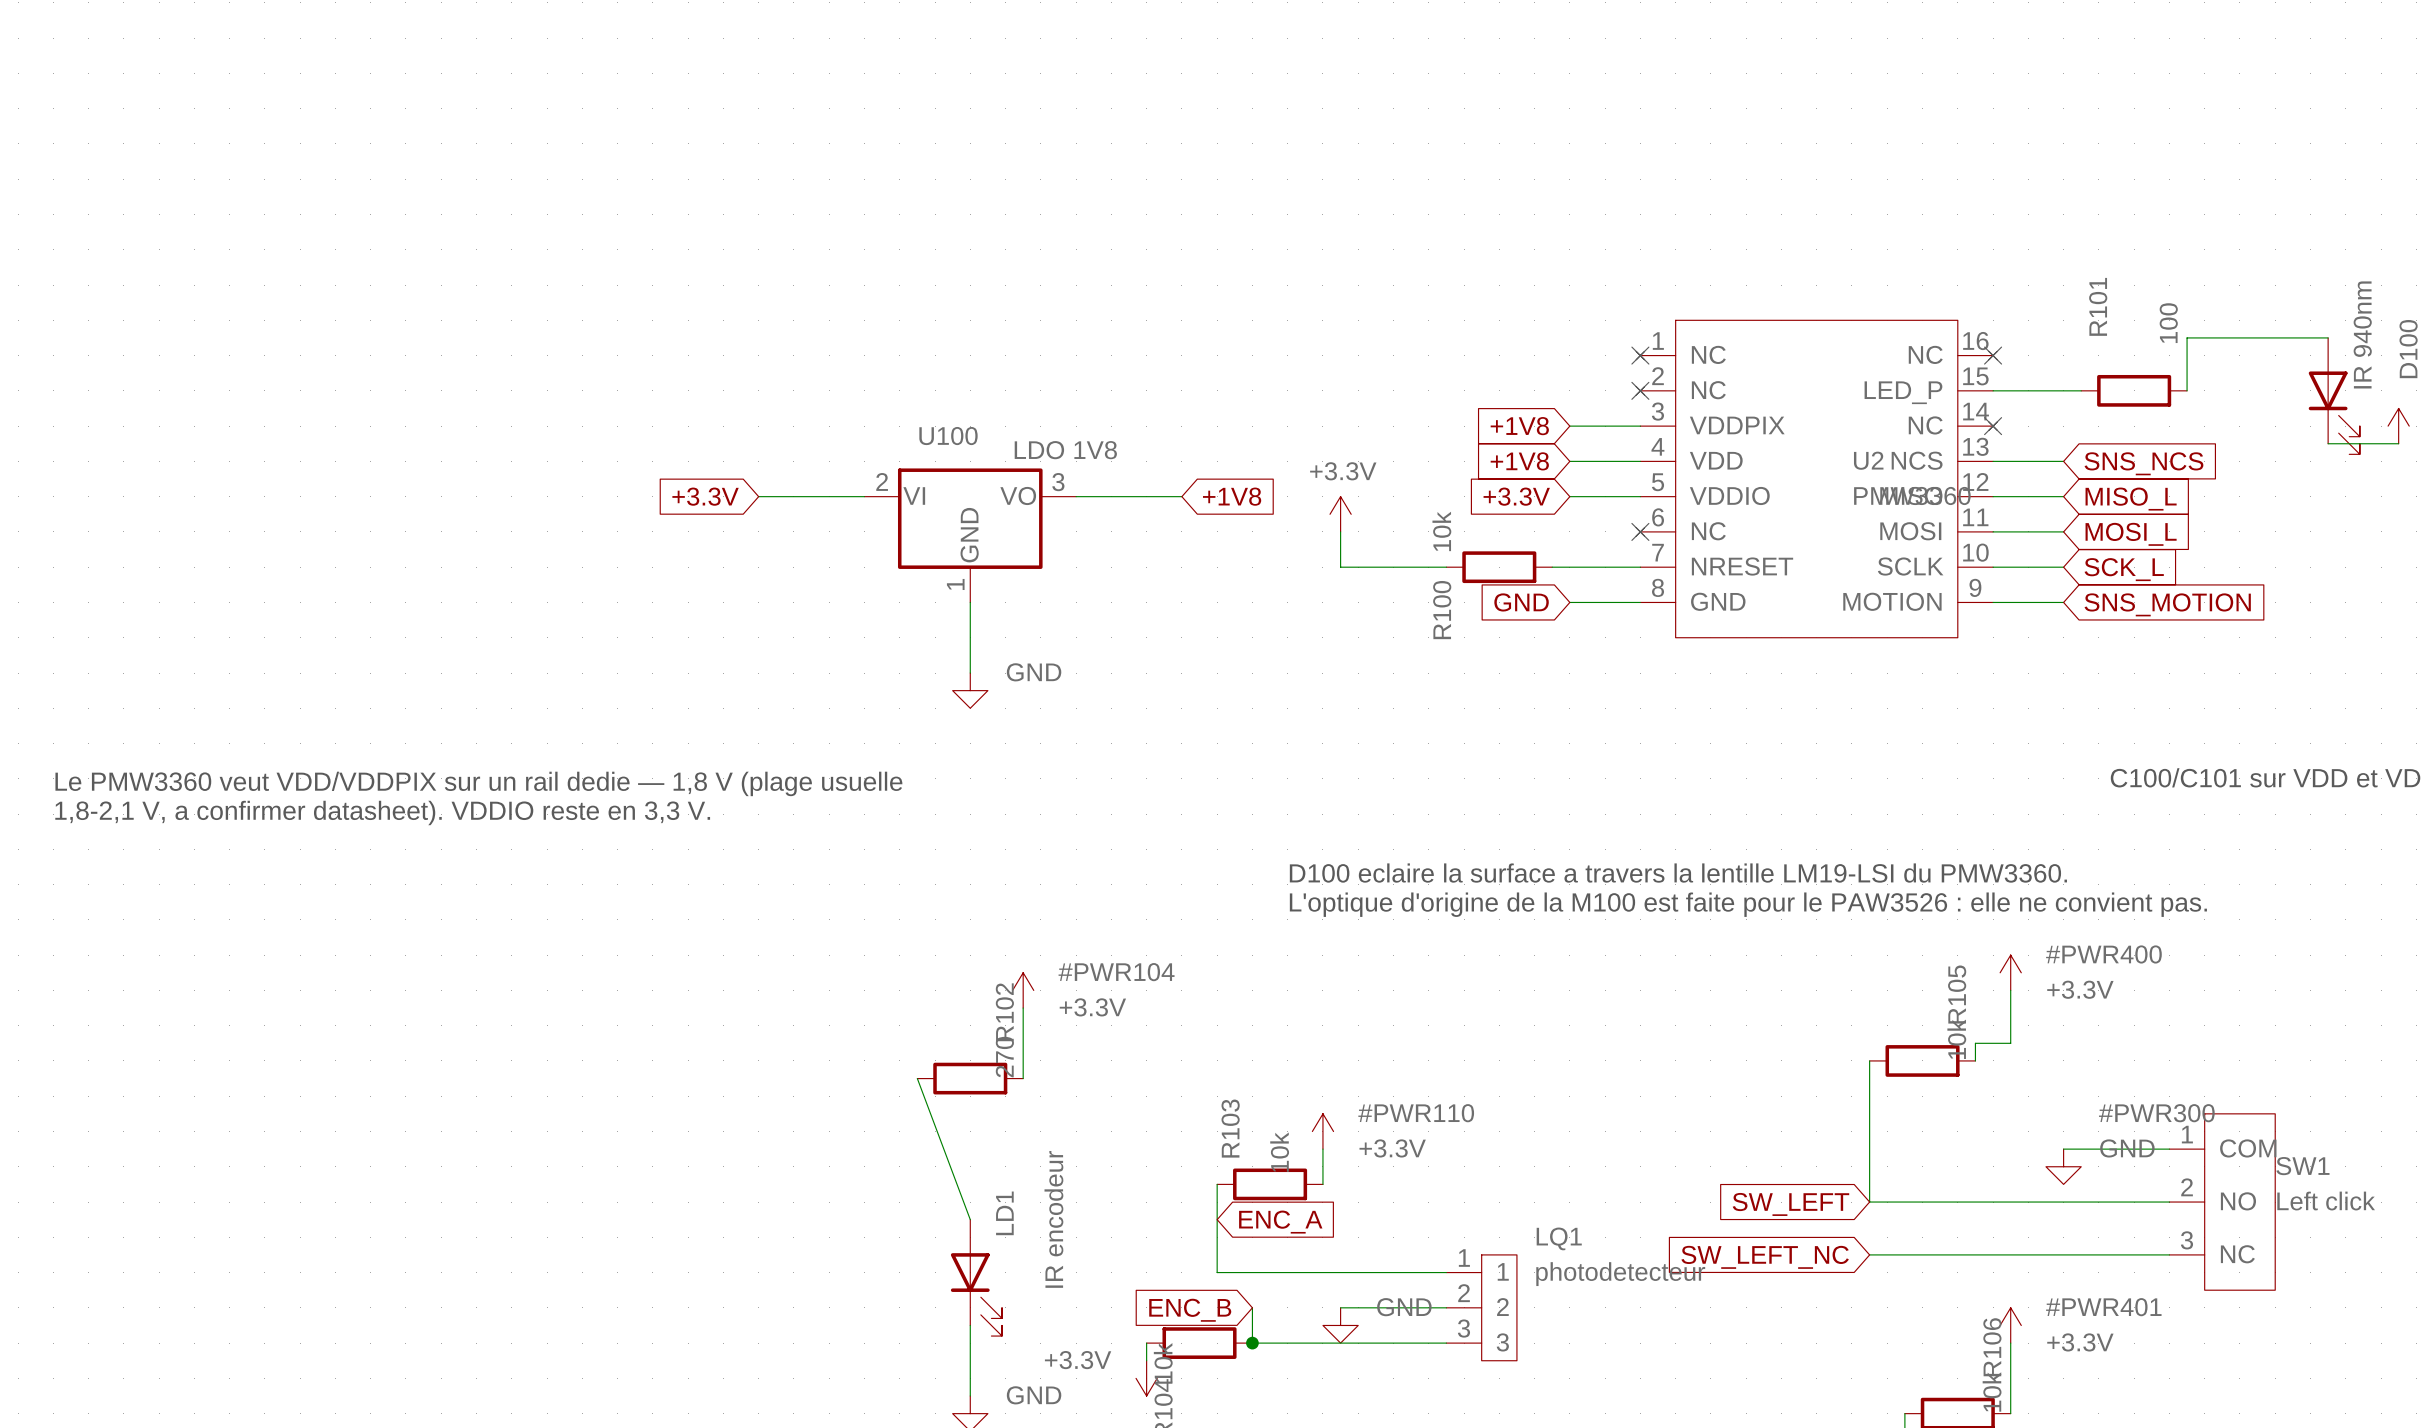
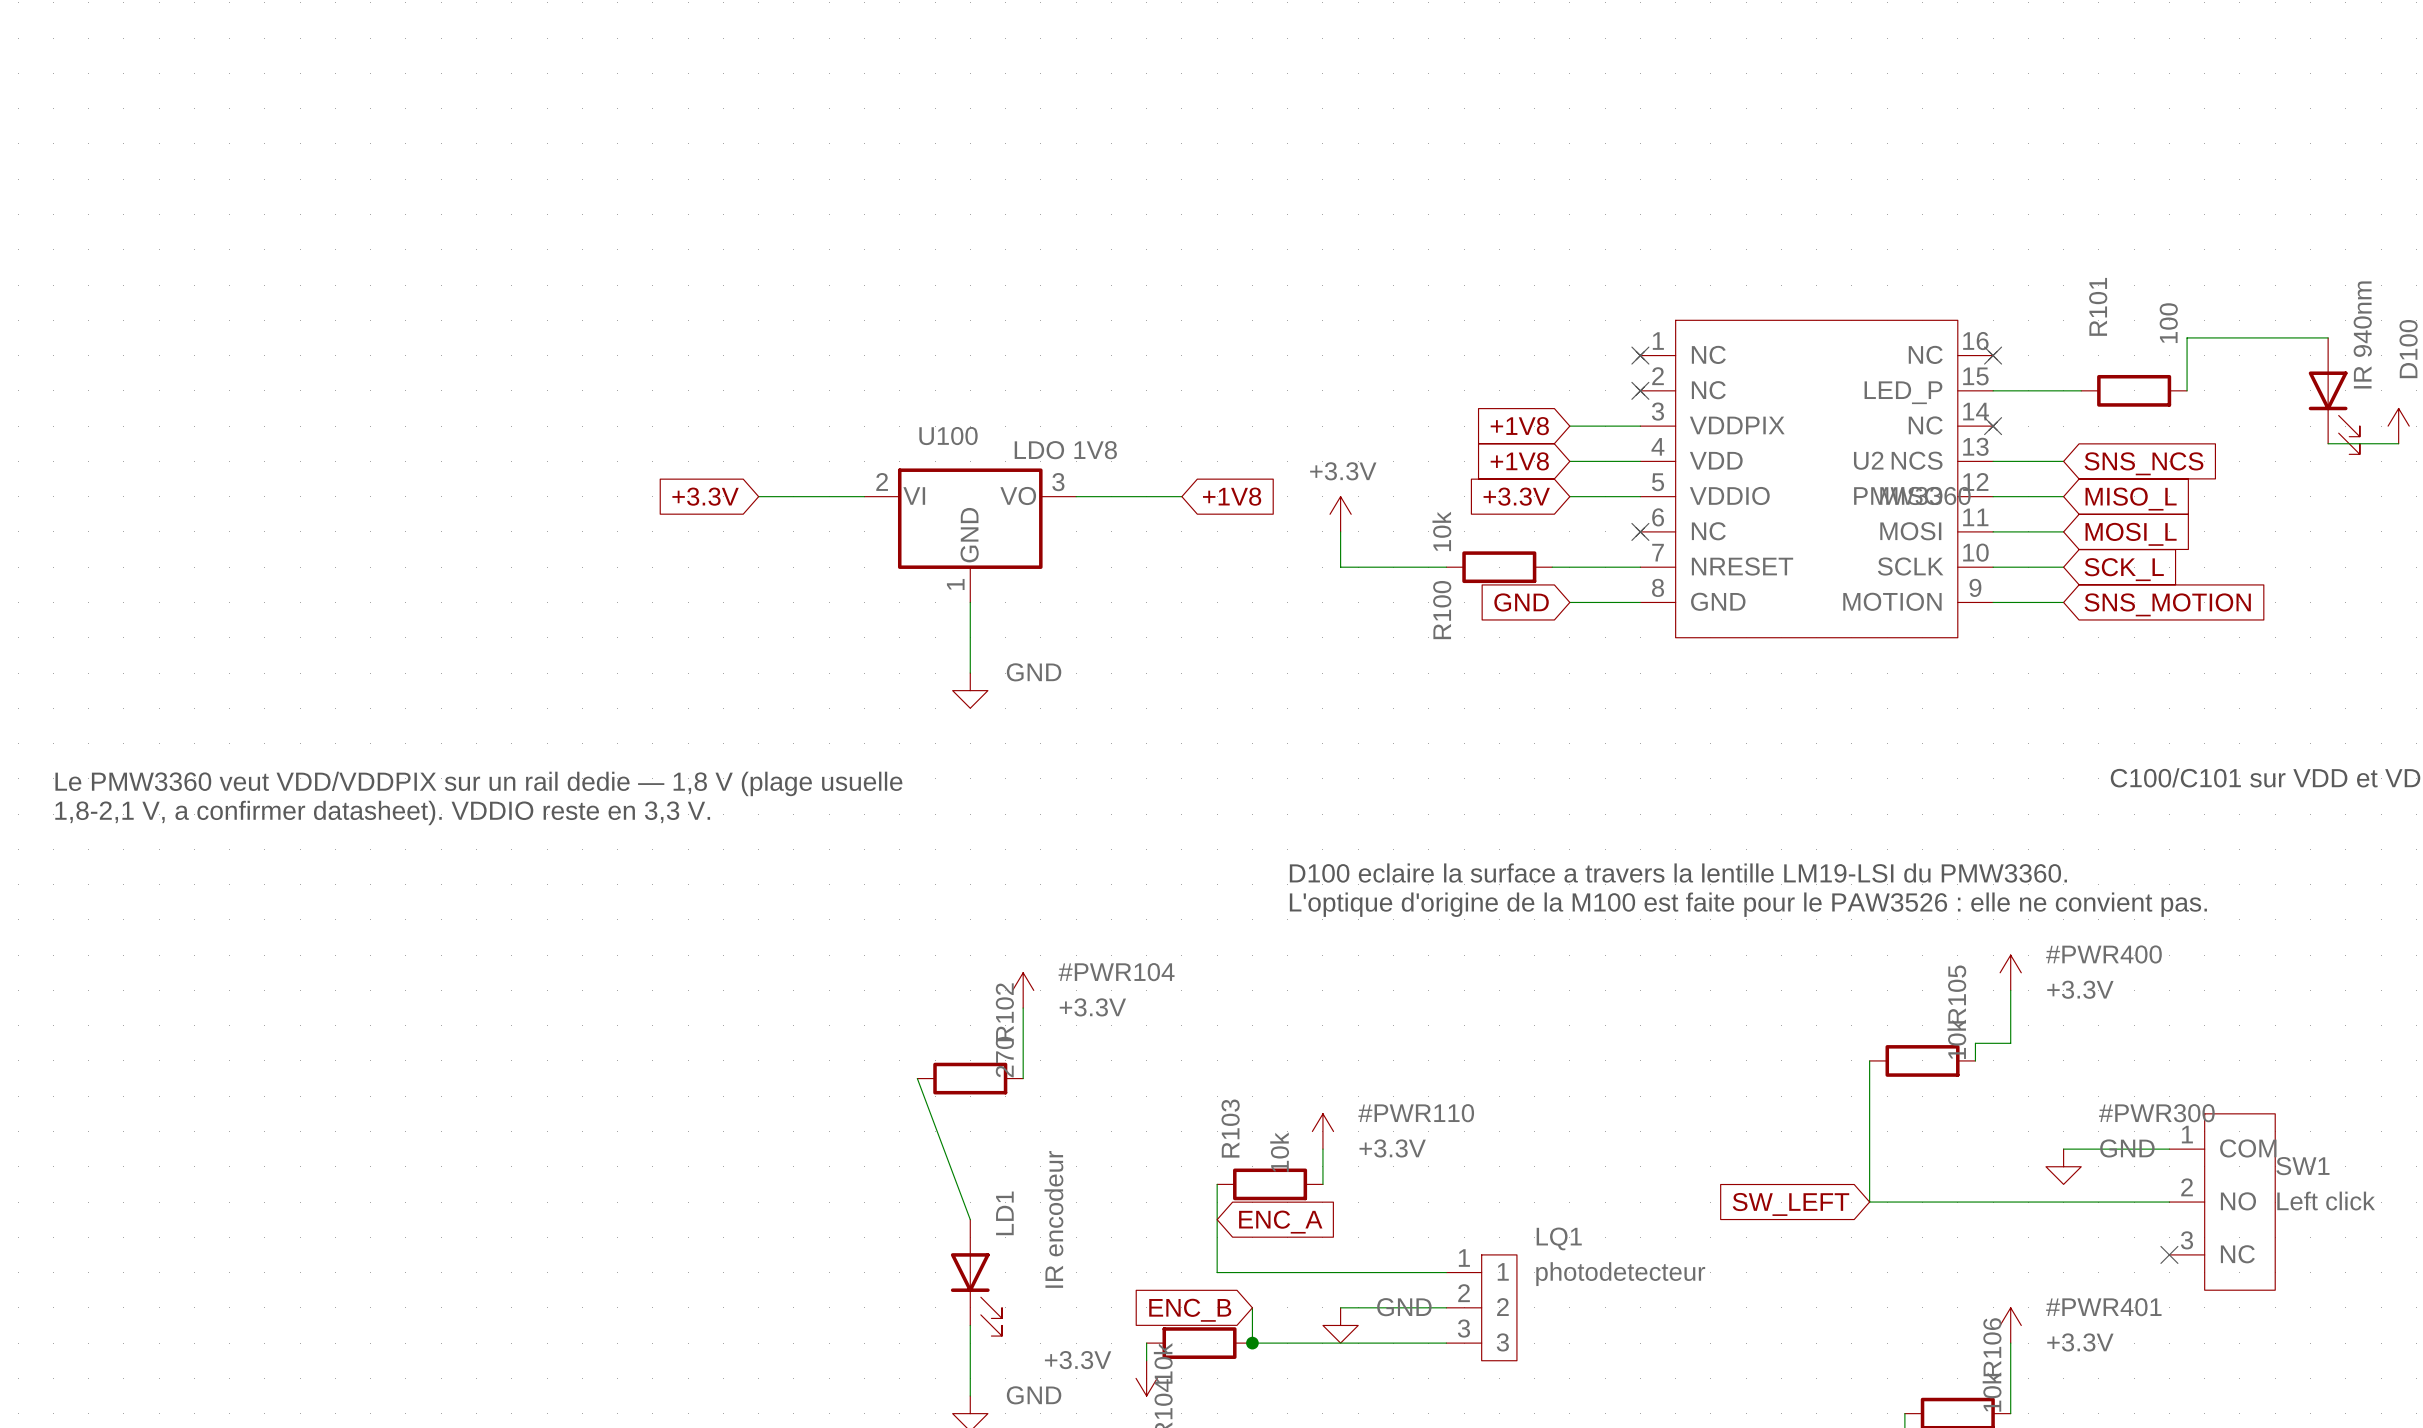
wire: (1869, 1254) (2169, 1254) -> none
no-connect mark: none -> (2169, 1254)
global label: SW_LEFT_NC (1765, 1257) -> none

